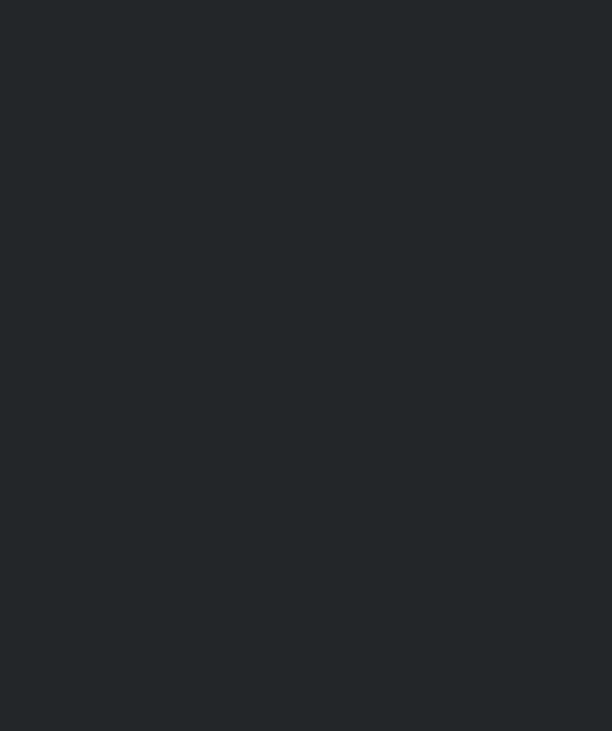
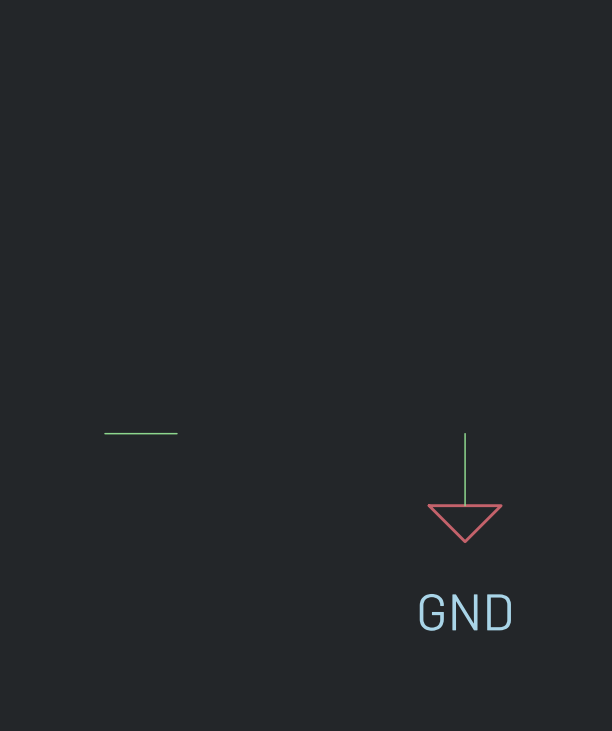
wire: none -> (104, 433) (176, 433)
wire: none -> (465, 433) (465, 505)
power symbol: none -> GND (465, 523)

